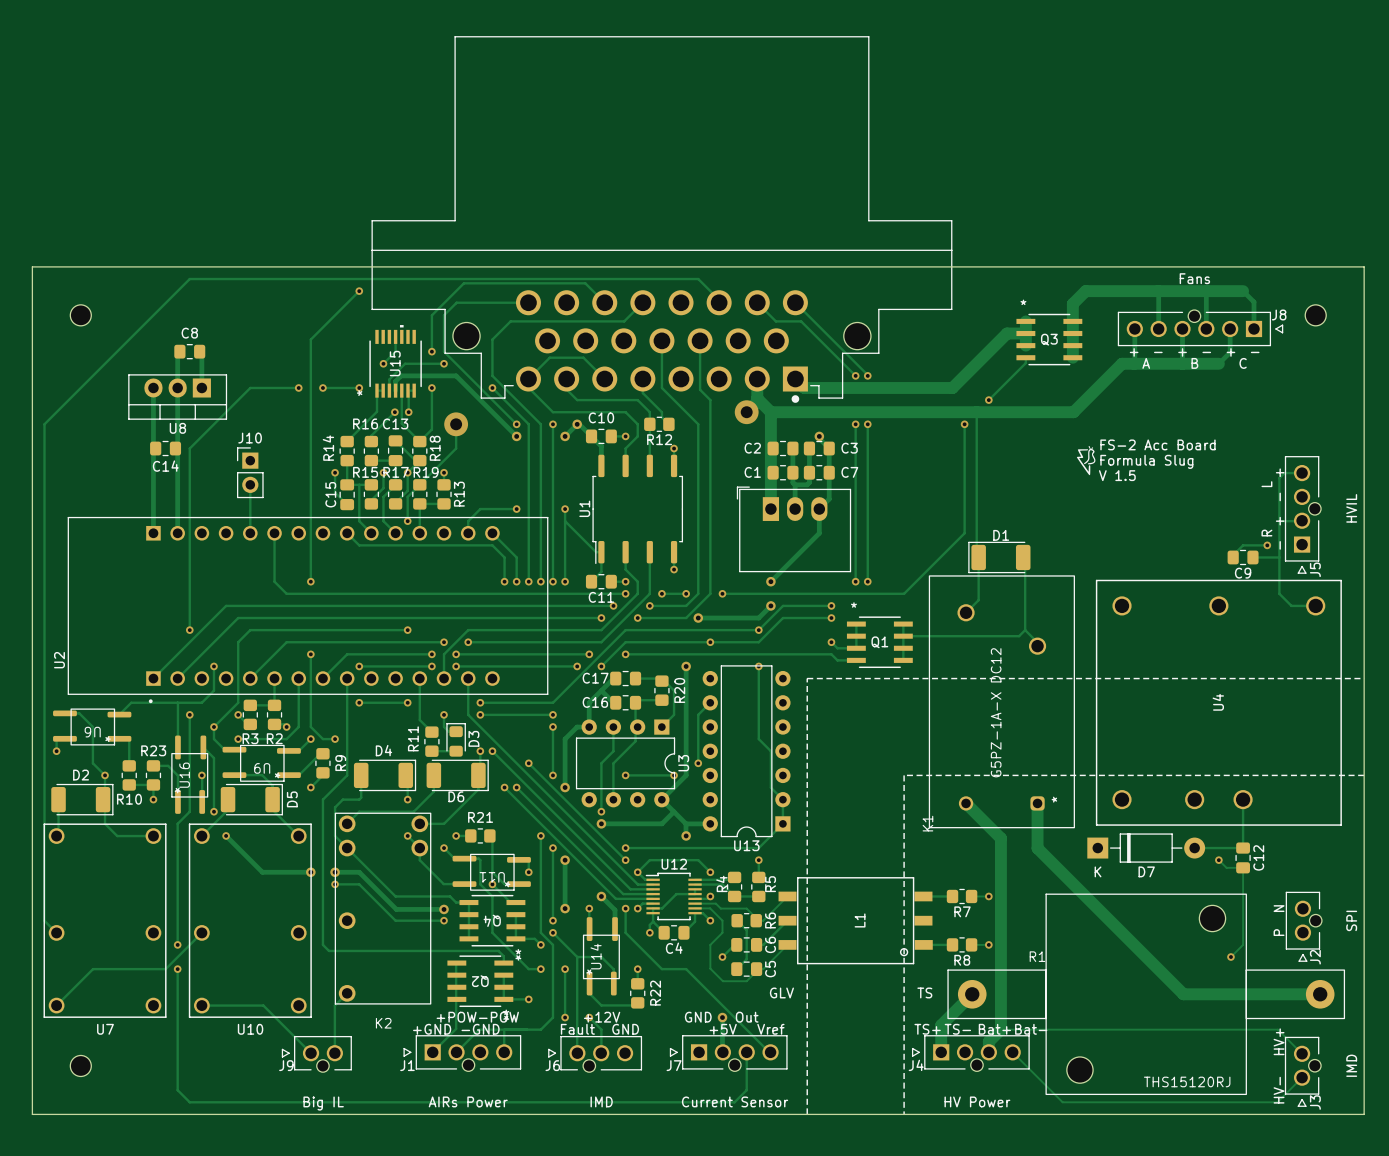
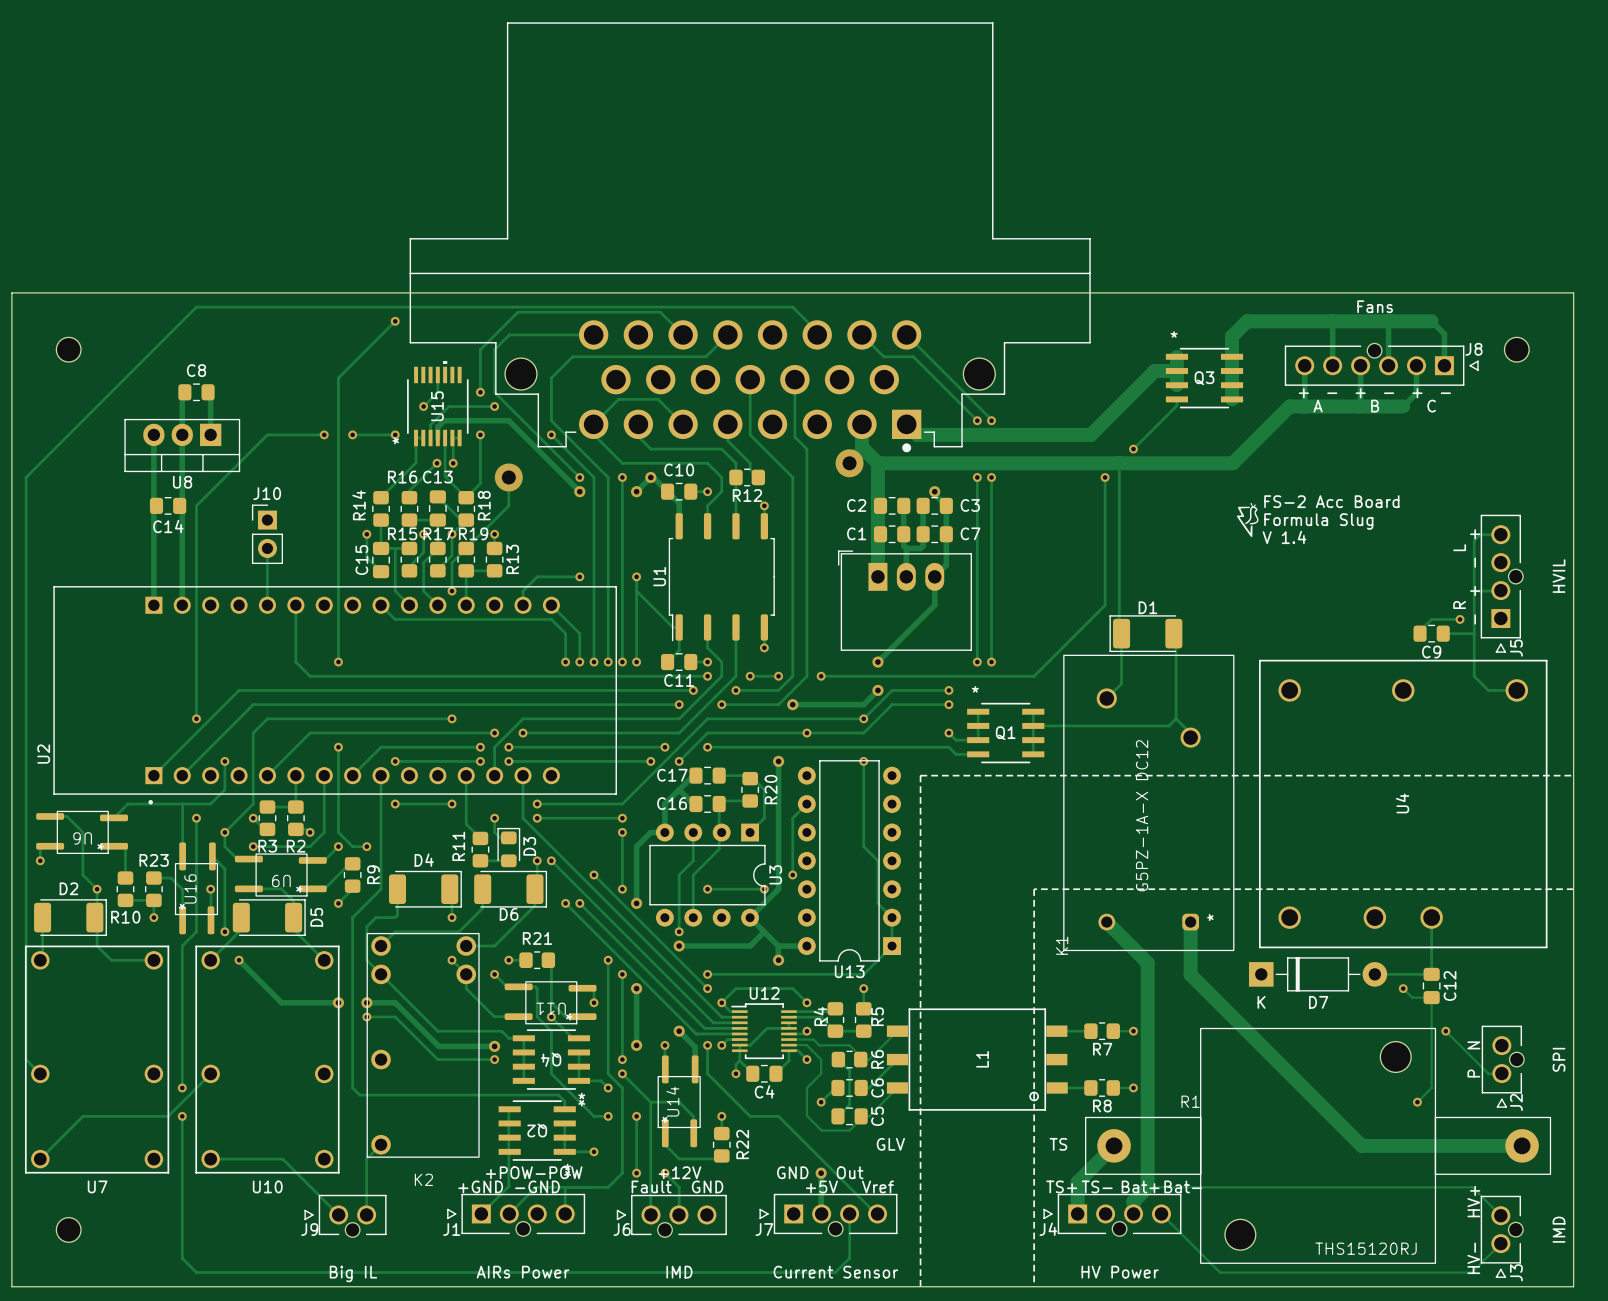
text: V 1.5 (1117, 475) -> V 1.4 (1284, 537)
track: none -> (1445, 1031) (1488, 1073) (1501, 1073)
via: none -> (1445, 1031)

